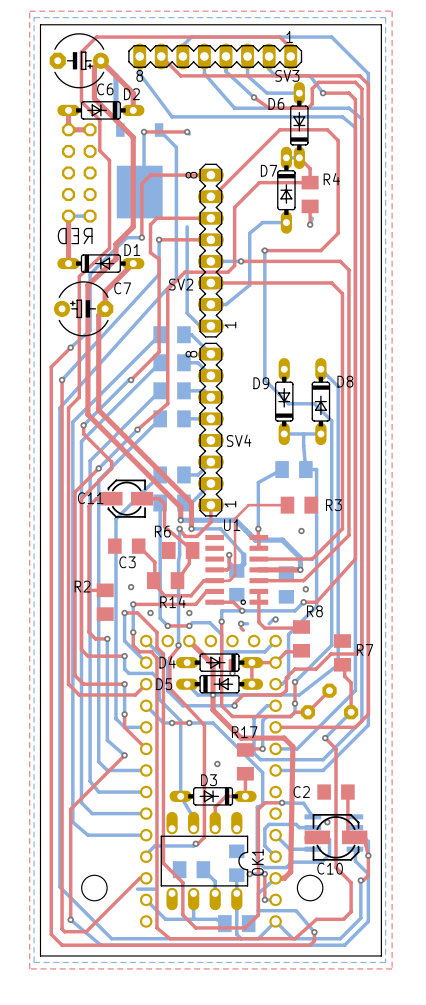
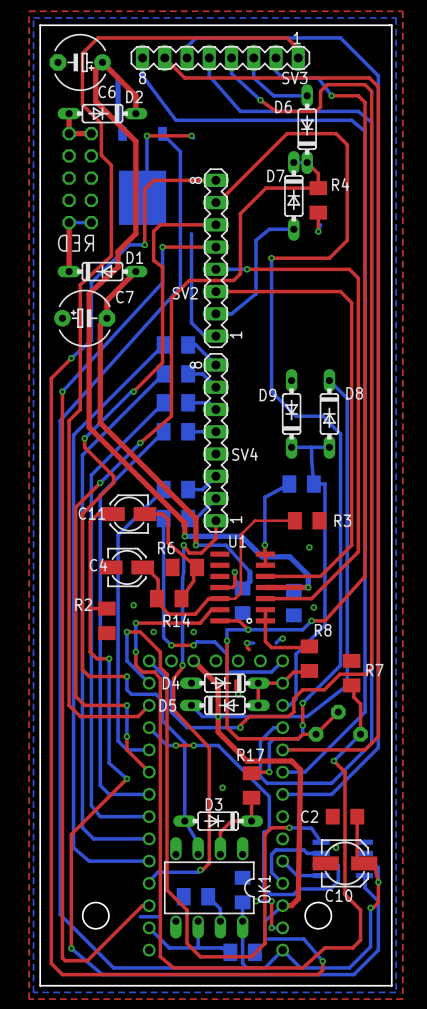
C3: (126, 546) -> none
C4: none -> (126, 567)

